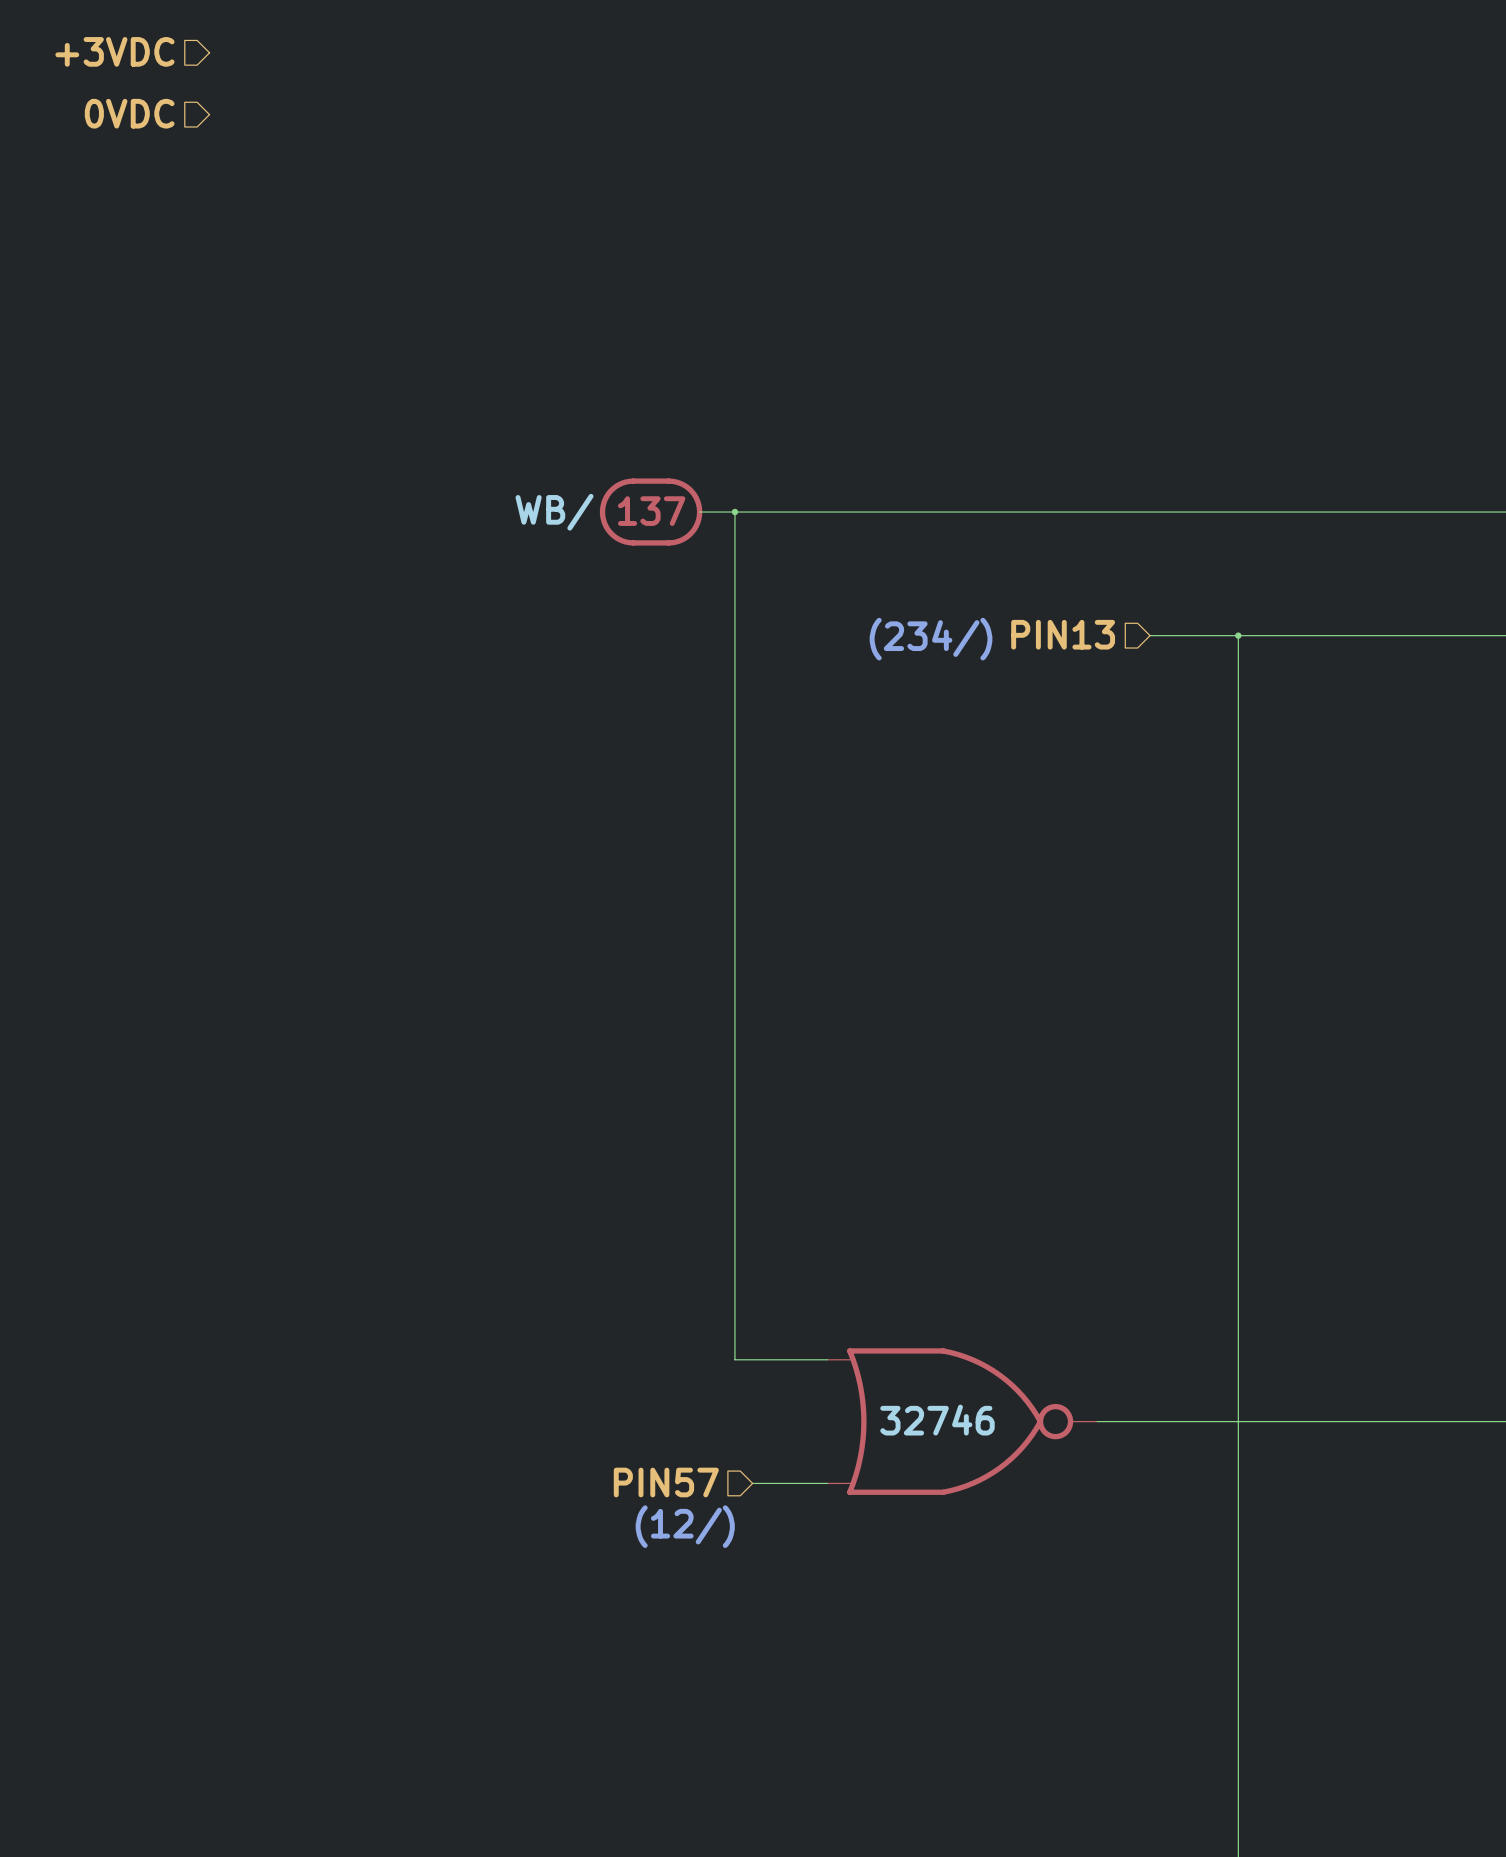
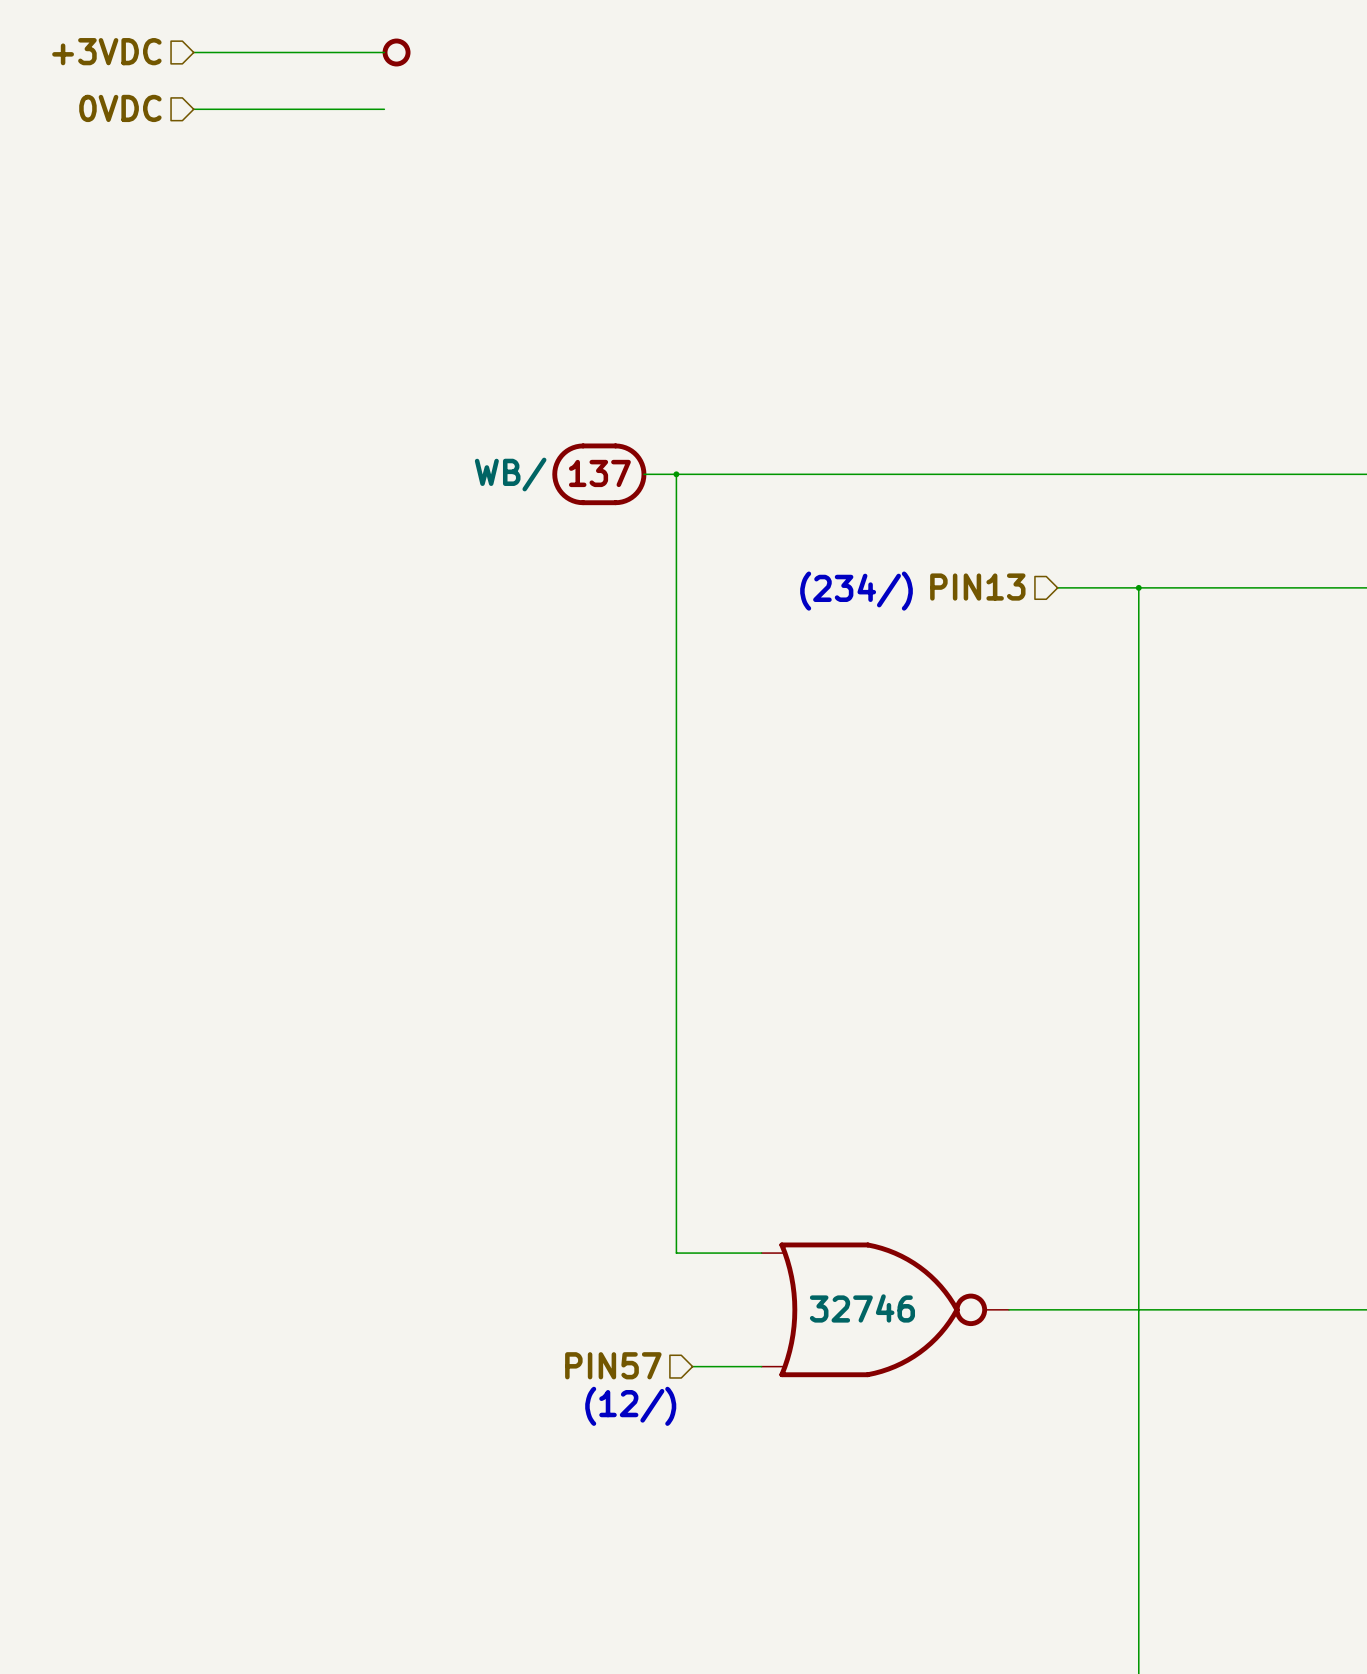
wire: none -> (193, 52) (384, 52)
part: none -> (396, 52)
wire: none -> (193, 109) (384, 109)

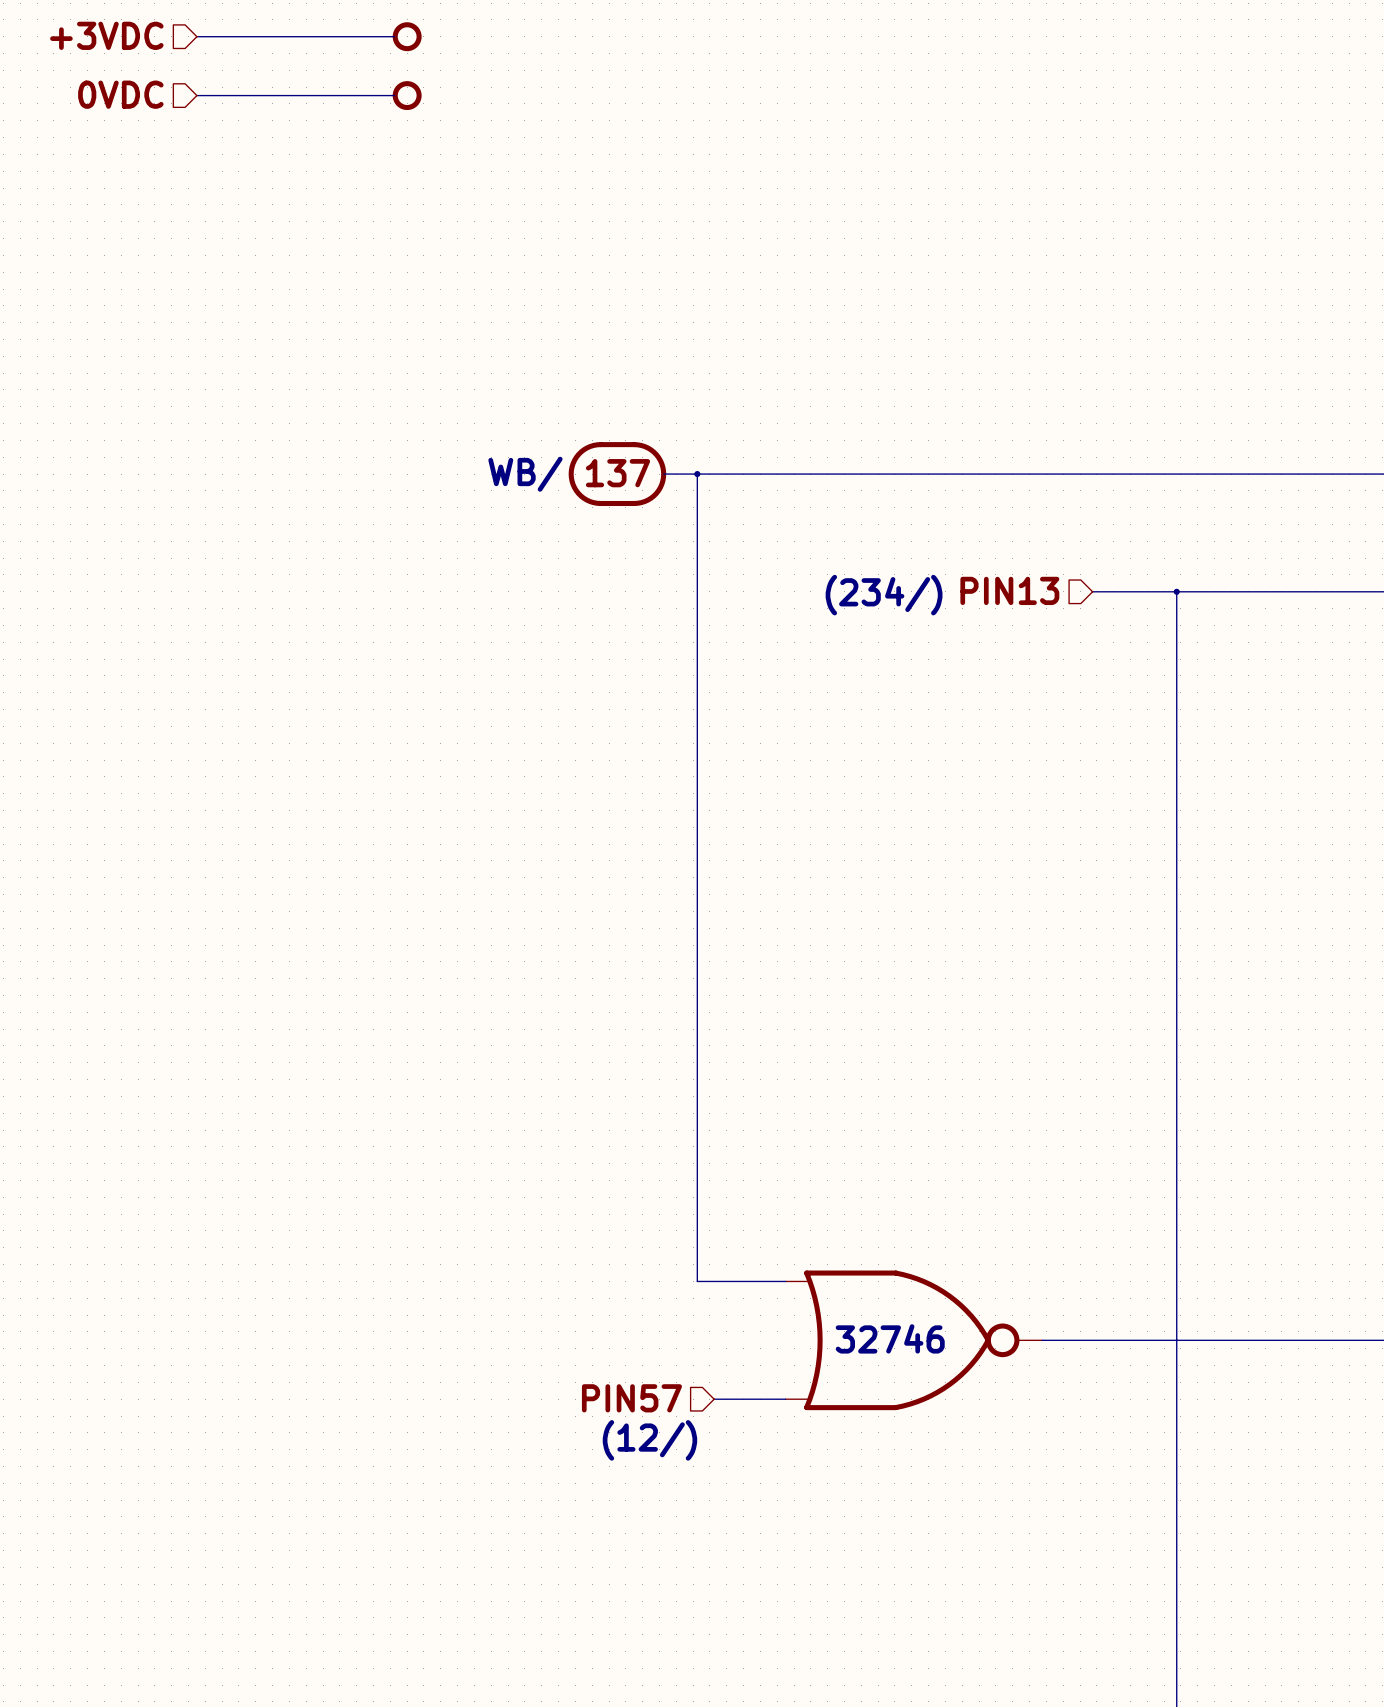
part: none -> (407, 95)

